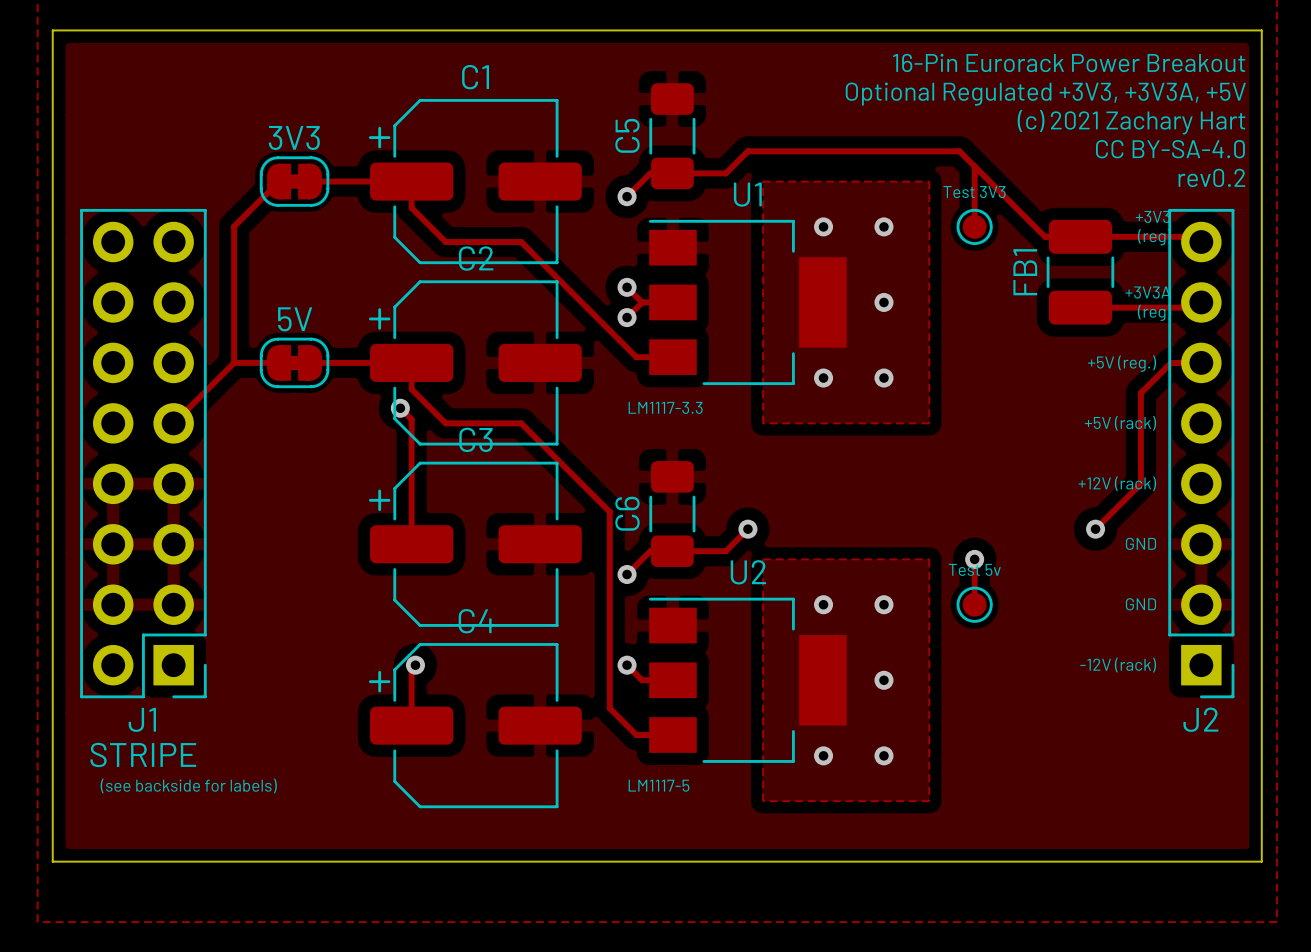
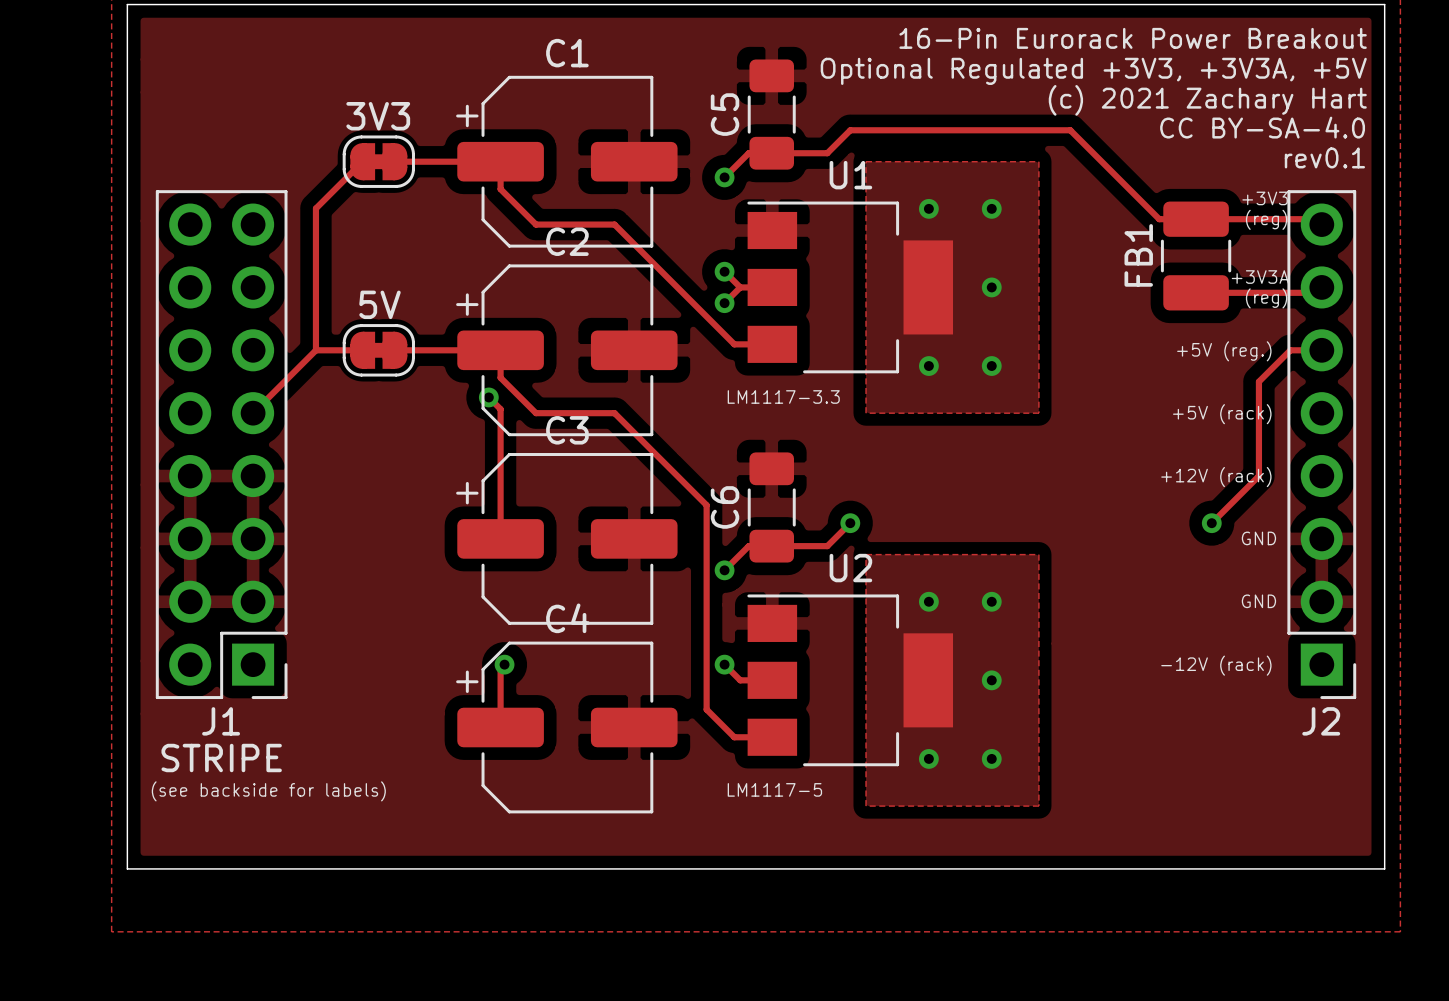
track: (974, 166) (974, 226) -> none
text: rev0.2 (1211, 177) -> rev0.1 (1324, 157)
Test 3V3: (974, 226) -> none
track: (974, 559) (974, 604) -> none
via: (974, 559) -> none
Test 5v: (974, 604) -> none

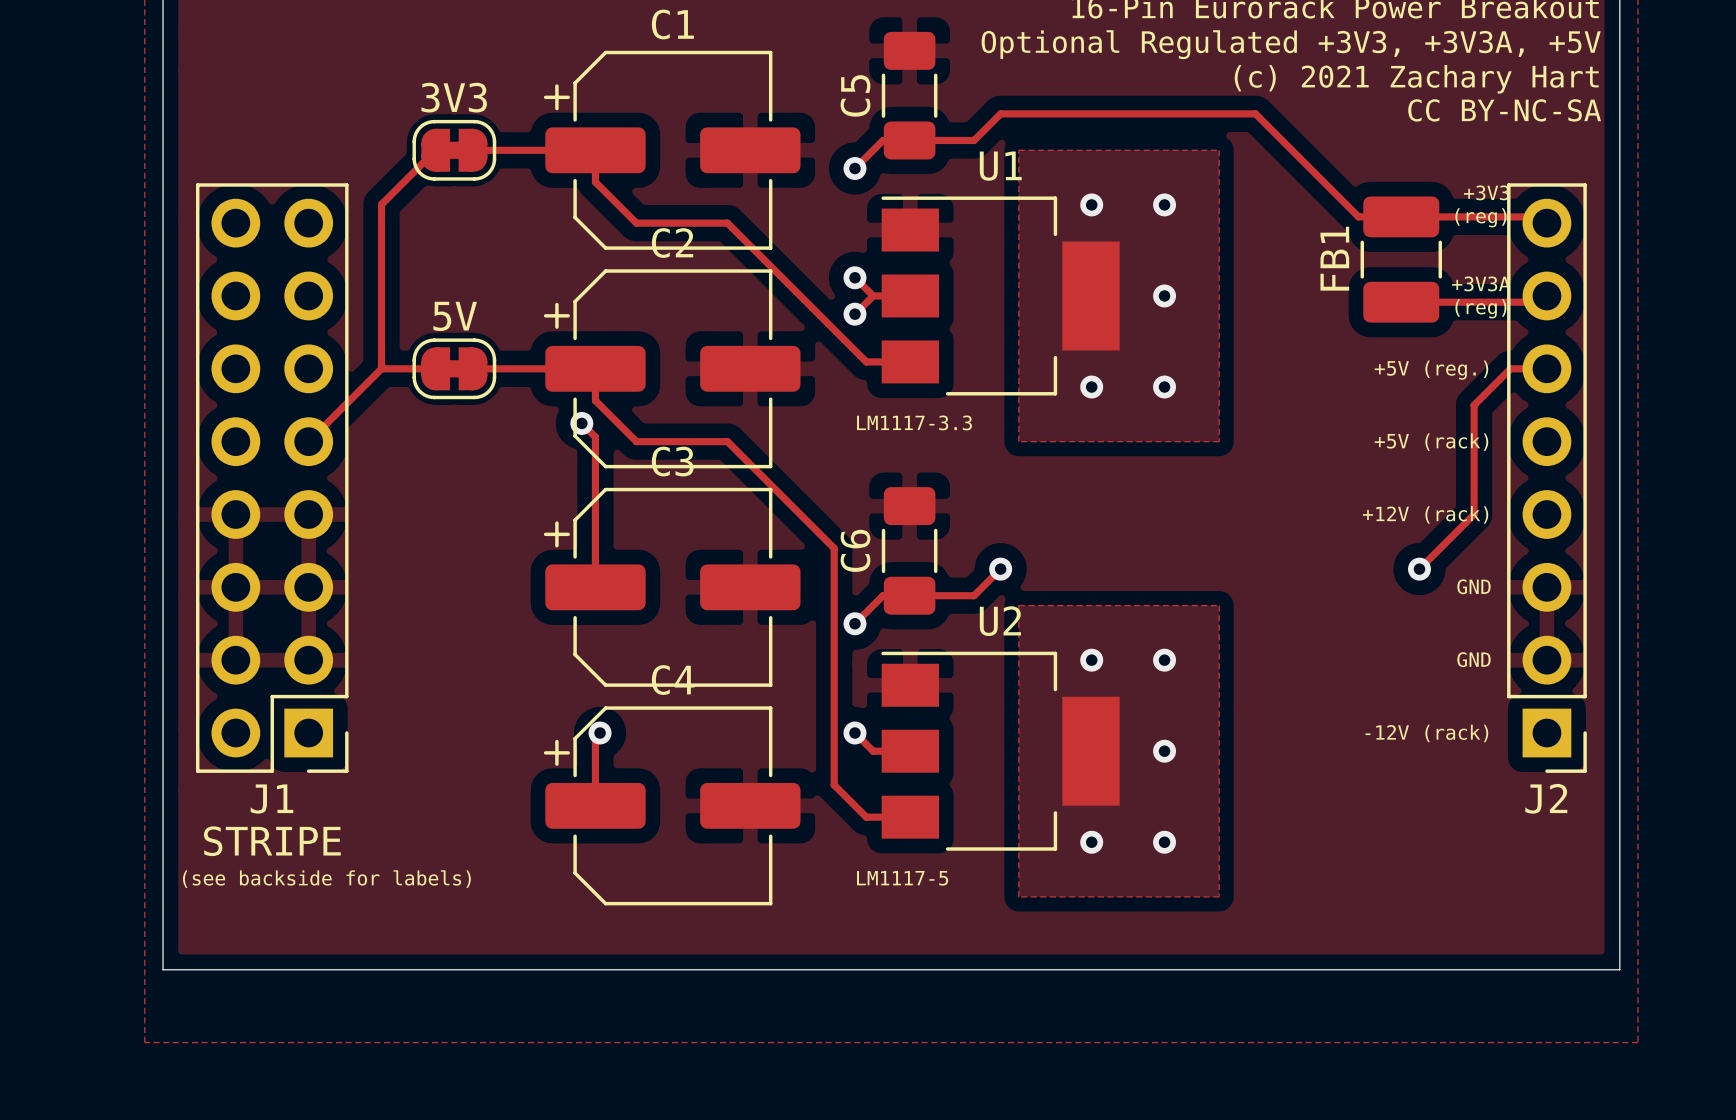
text: CC BY-SA-4.0 (1262, 127) -> CC BY-NC-SA (1504, 110)
text: rev0.1 (1324, 157) -> none

